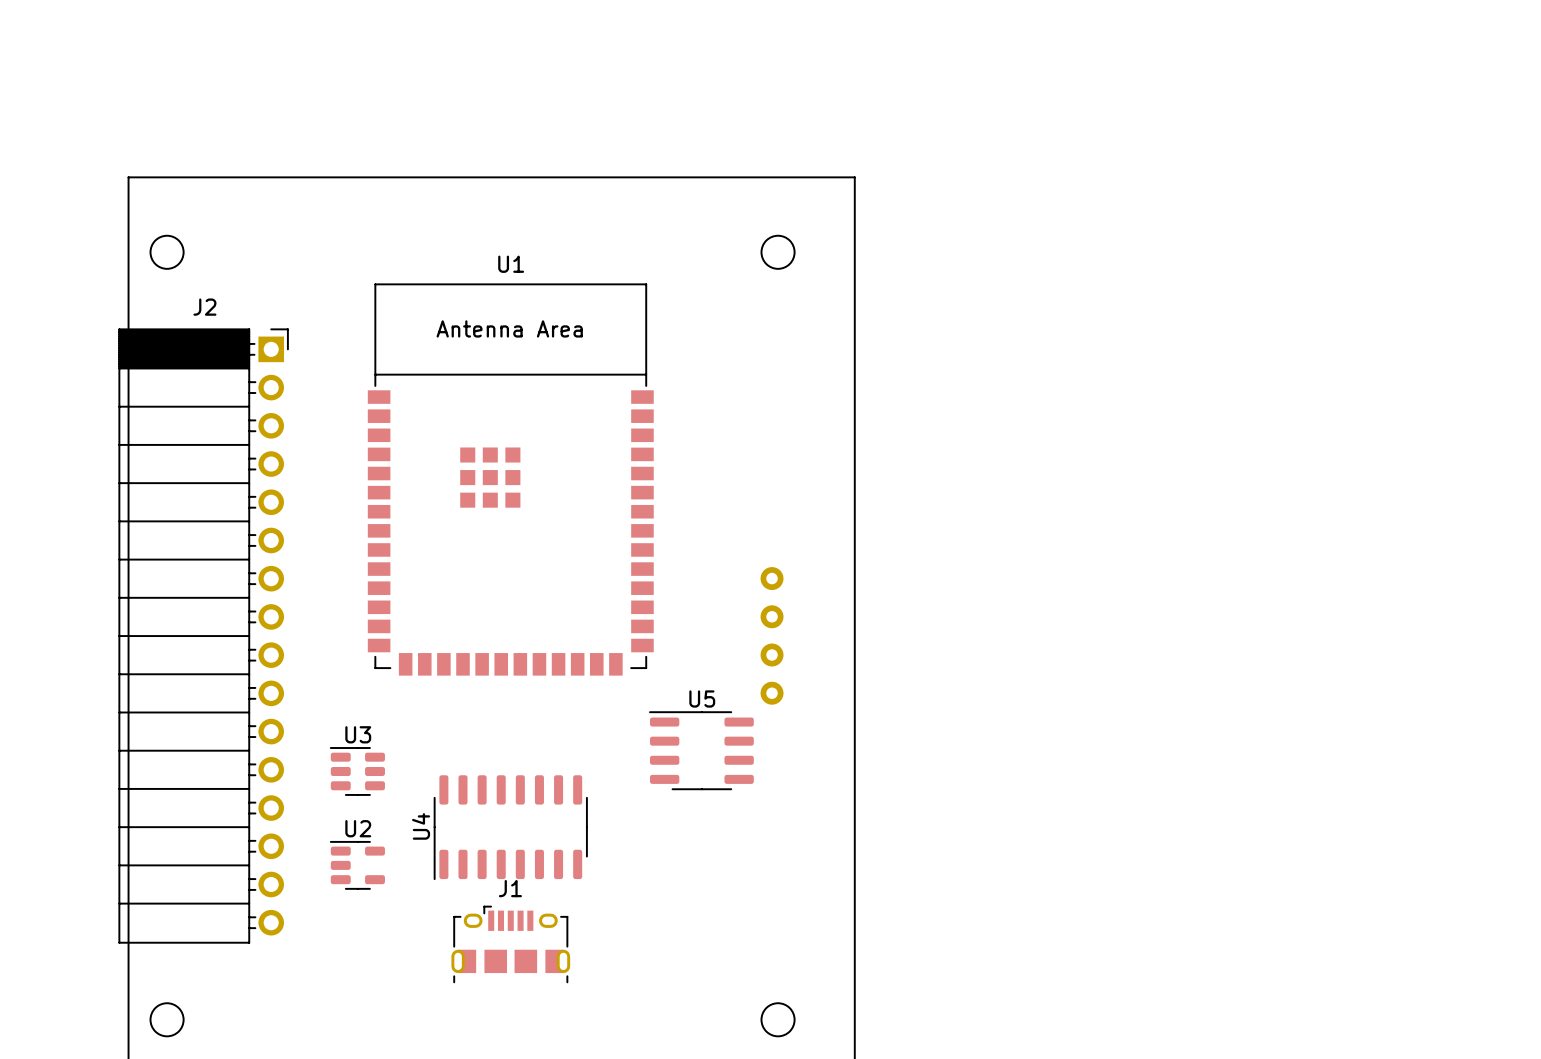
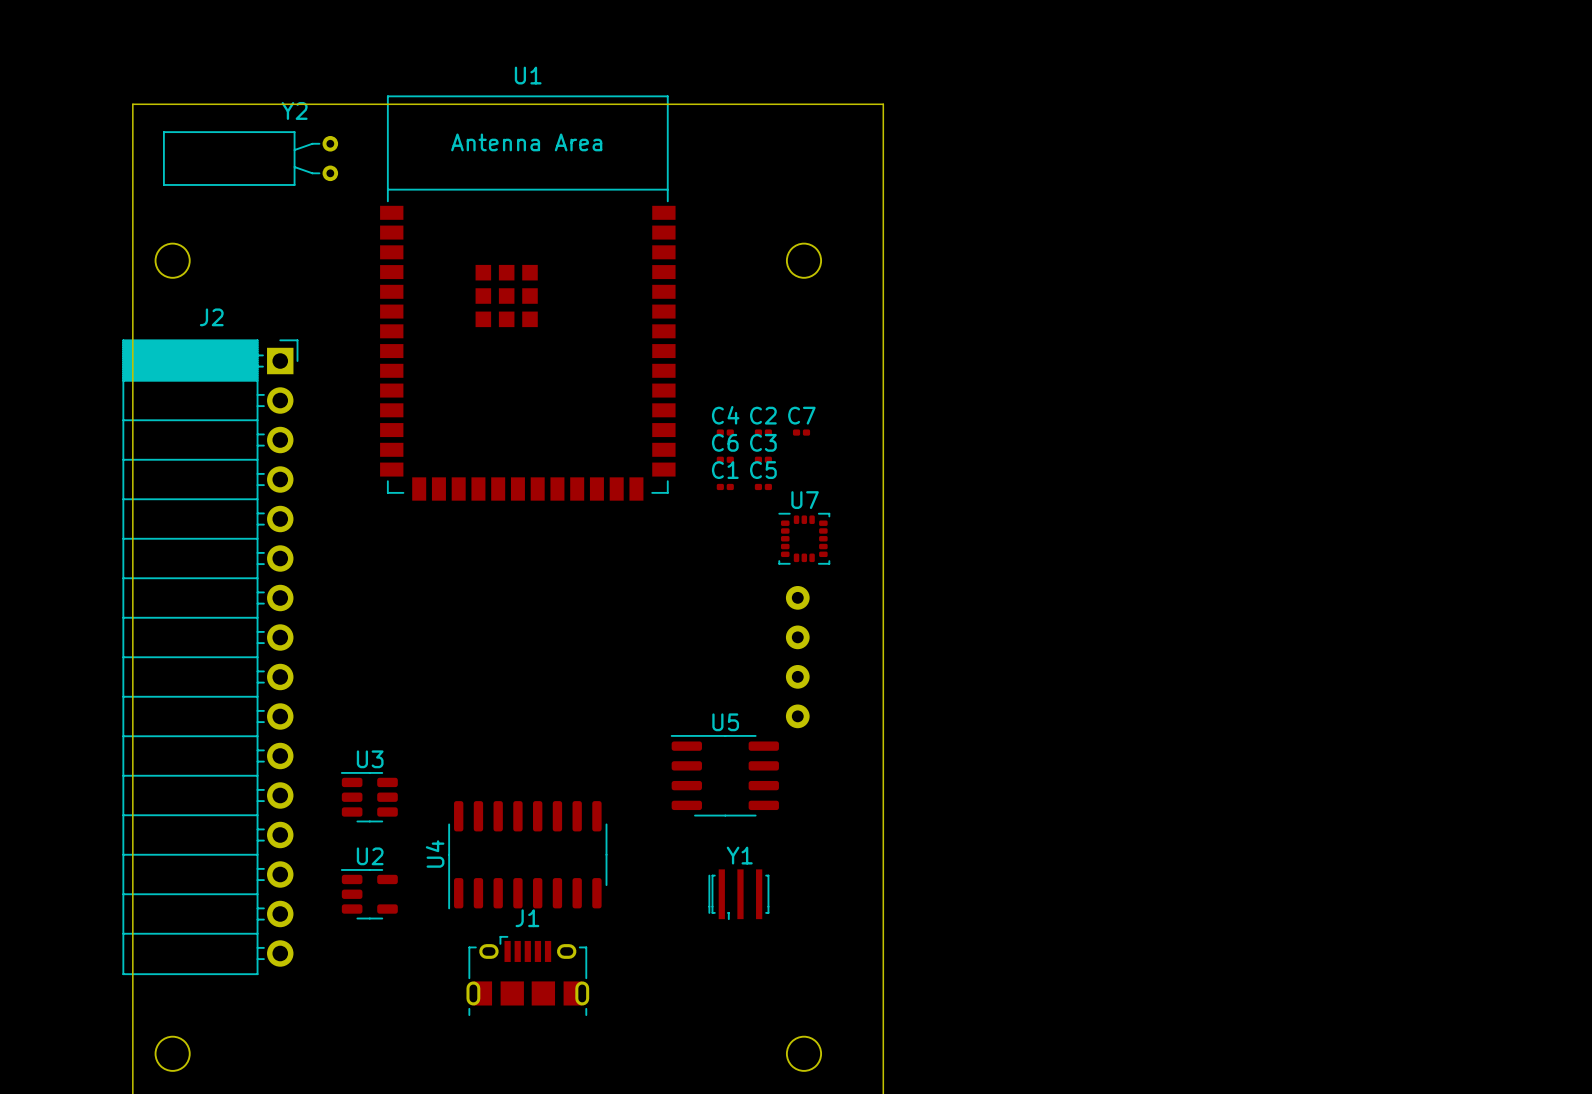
Y2: none -> (250, 158)
board edge: (128, 177) (854, 177) -> (132, 183) (132, 104) (883, 104) (883, 183)
C4: none -> (725, 432)
C2: none -> (763, 432)
C7: none -> (801, 432)
C6: none -> (725, 459)
C3: none -> (763, 459)
C1: none -> (725, 486)
C5: none -> (763, 486)
U1 position: (510, 479) -> (527, 298)
U7: none -> (804, 538)
Y1: none -> (738, 894)

